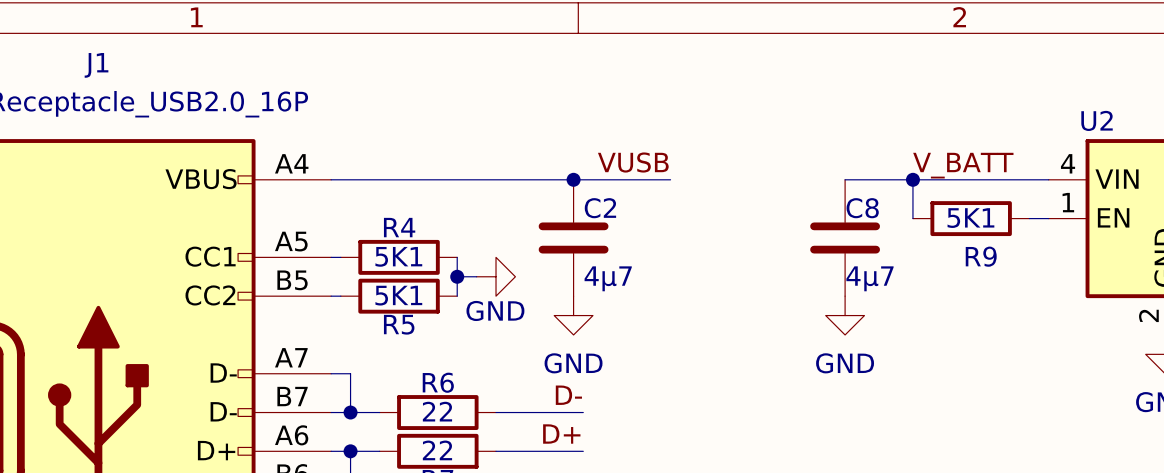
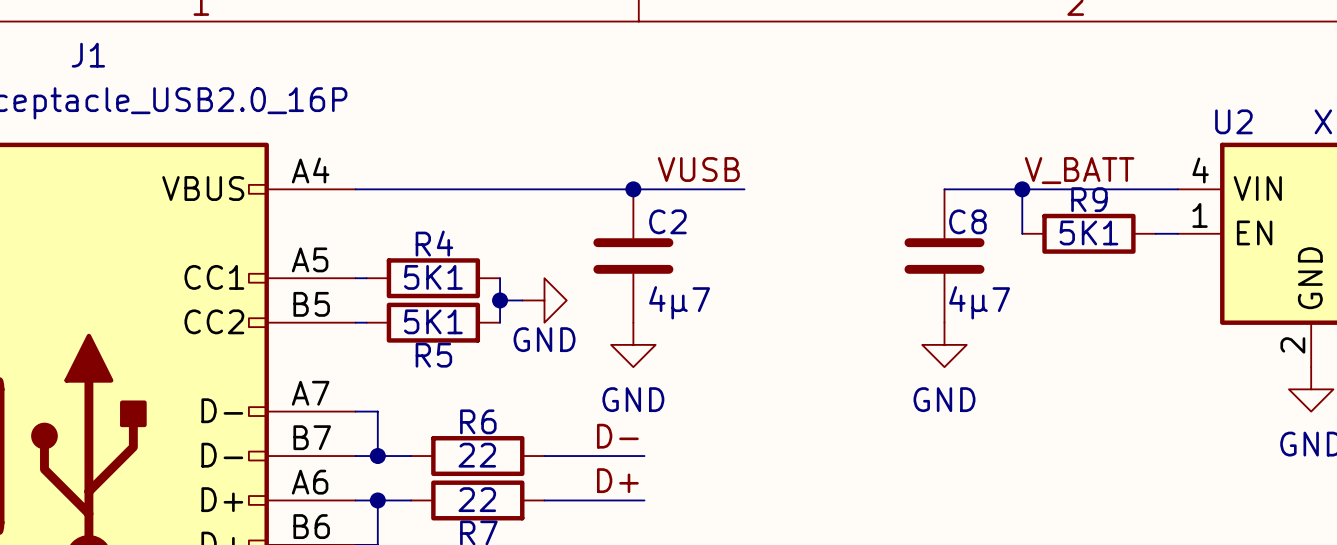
R9 name position: R9 (981, 256) -> R9 (1089, 199)

